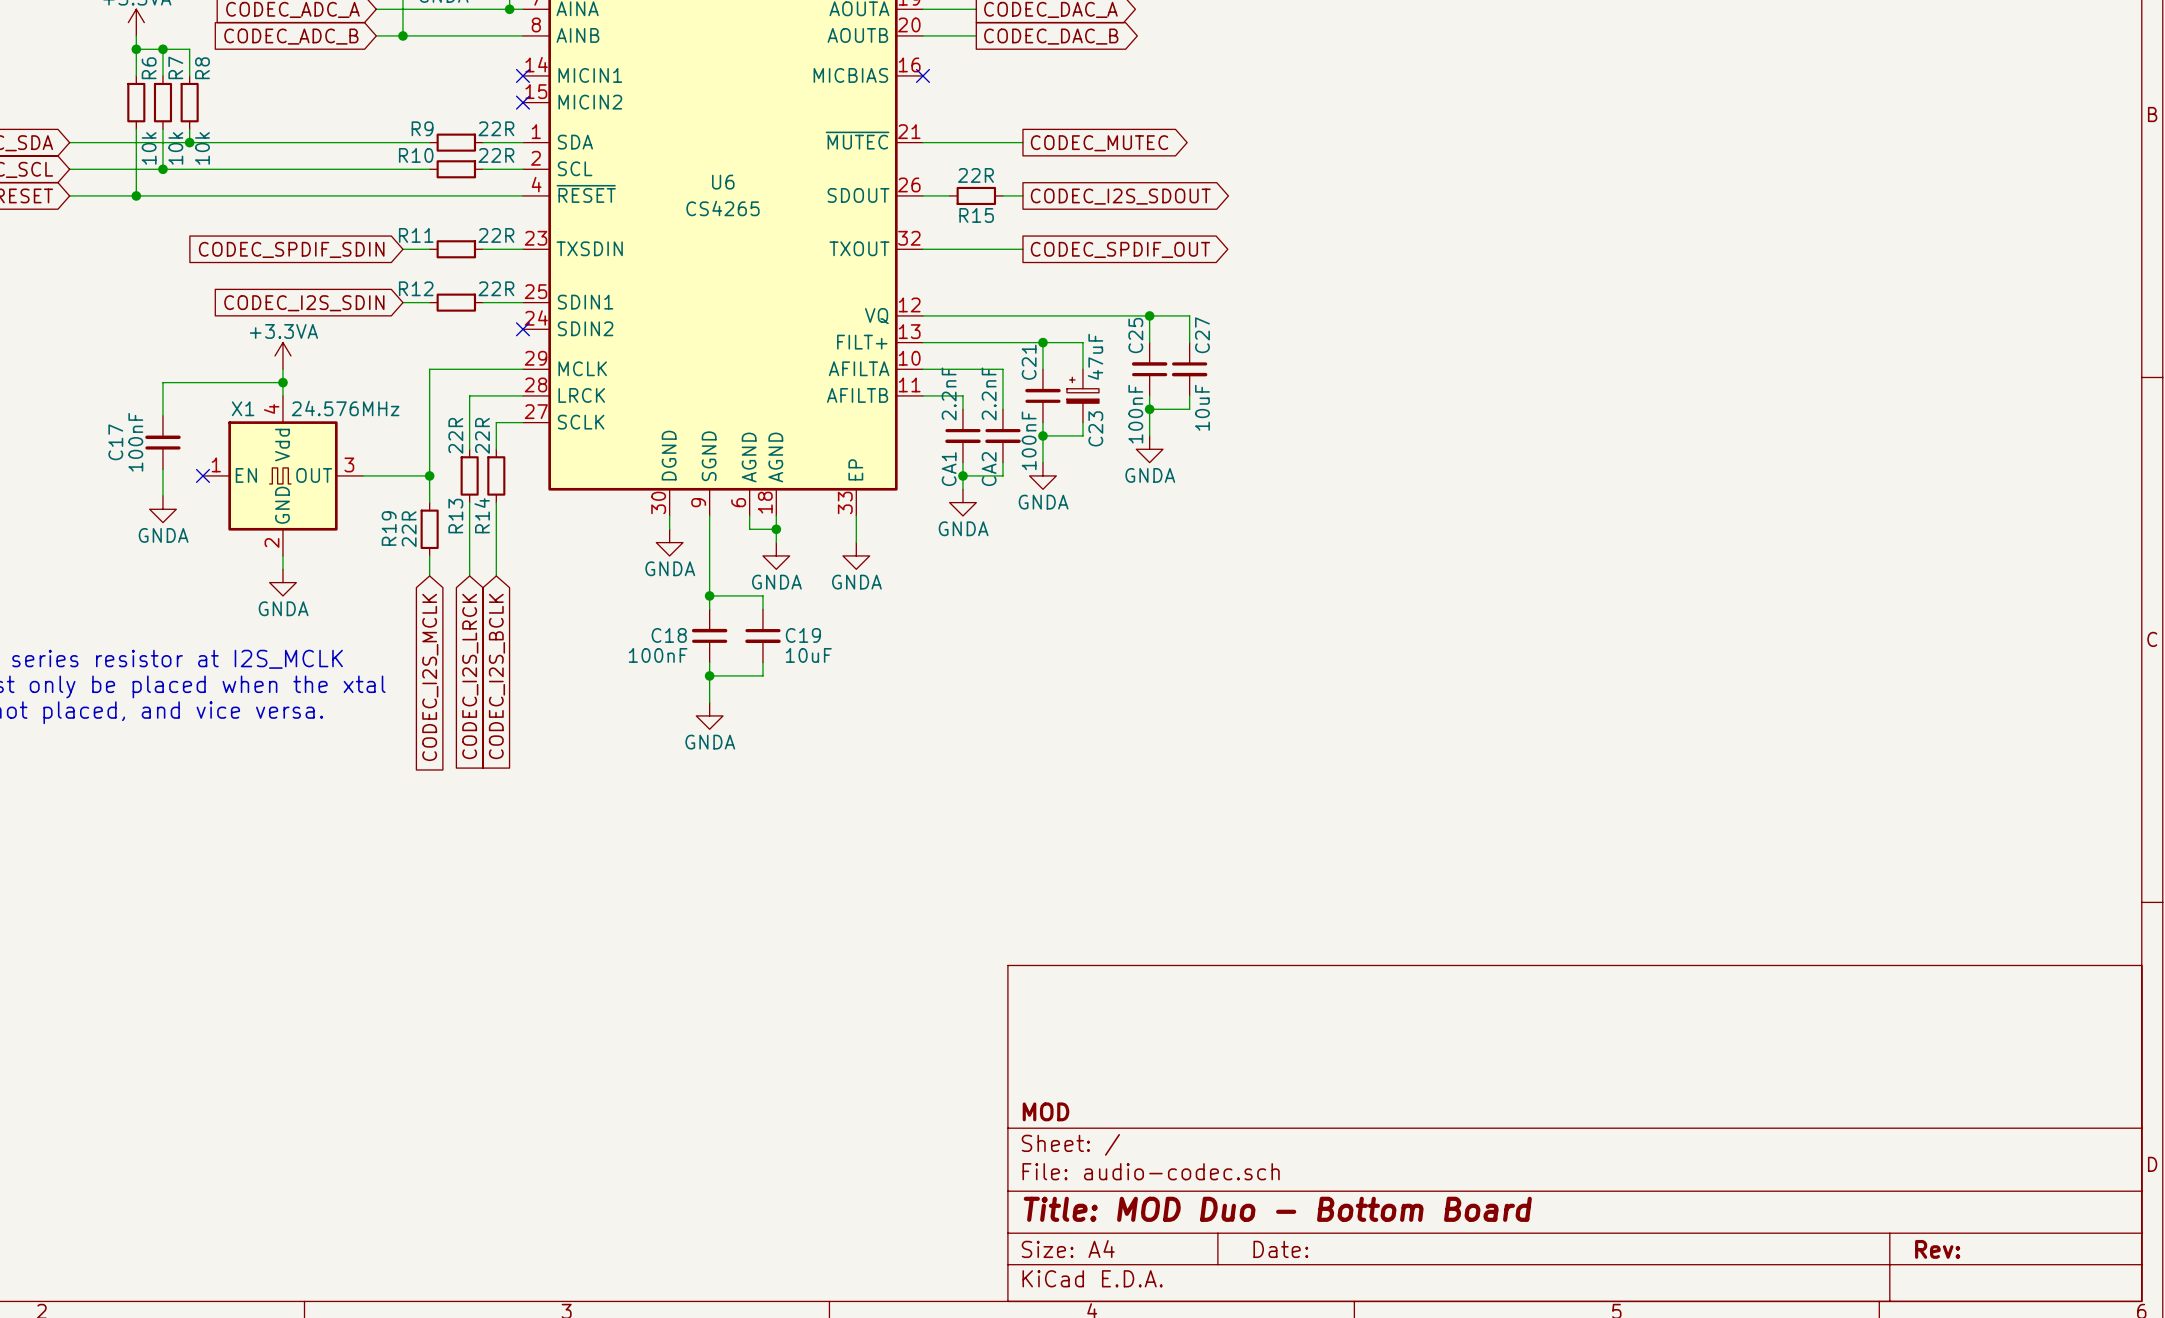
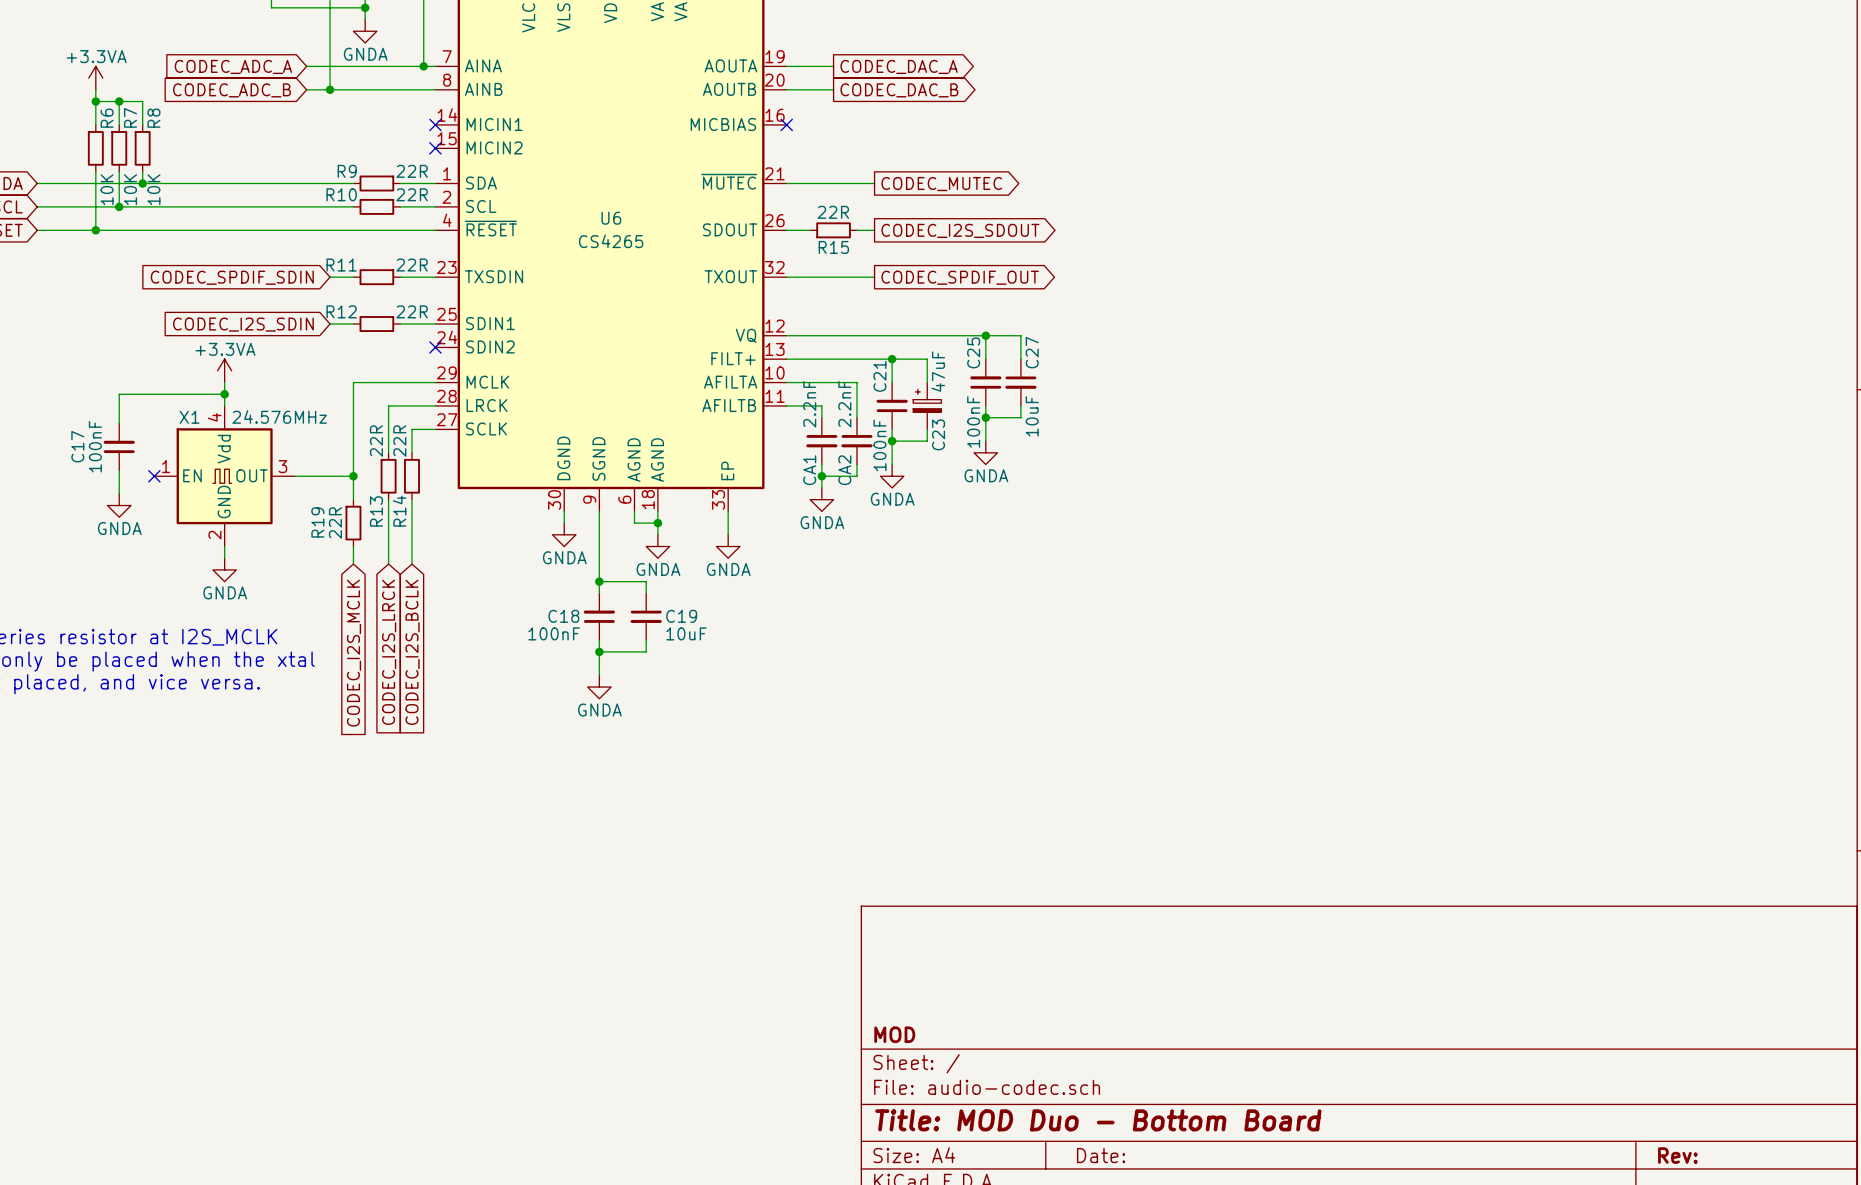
R6 value: 10k (149, 148) -> 10K (107, 189)
R7 value: 10k (175, 148) -> 10K (130, 189)
R8 value: 10k (202, 148) -> 10K (153, 189)

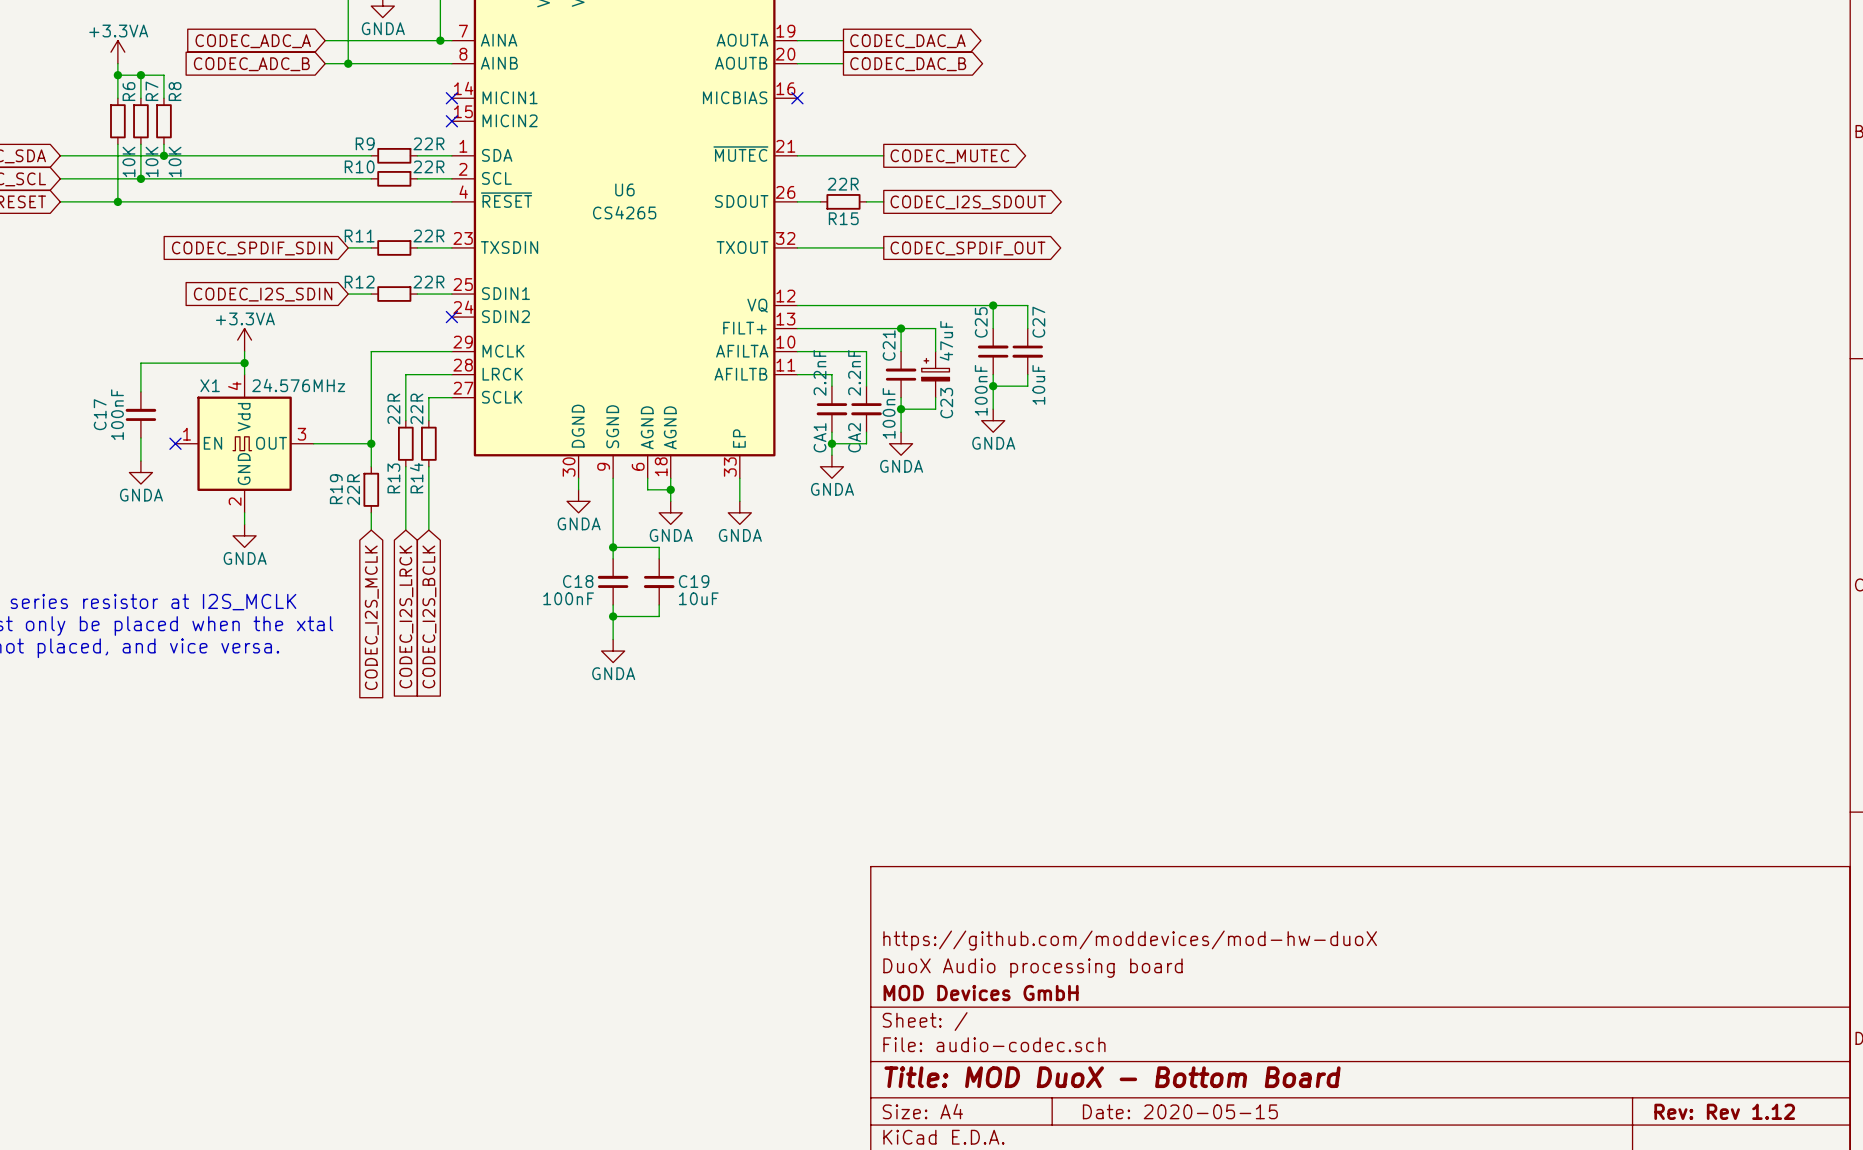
title block: none -> https://github.com/moddevices/mod-hw-duoX (1130, 940)
title block: none -> DuoX Audio processing board (1032, 968)
title block: MOD (894, 1034) -> MOD Devices GmbH (981, 993)
title block: Title: MOD Duo - Bottom Board (1098, 1120) -> Title: MOD DuoX - Bottom Board (1112, 1077)
title block: Date: (1101, 1155) -> Date: 2020-05-15 (1180, 1111)
title block: Rev: (1677, 1155) -> Rev: Rev 1.12 (1724, 1111)

